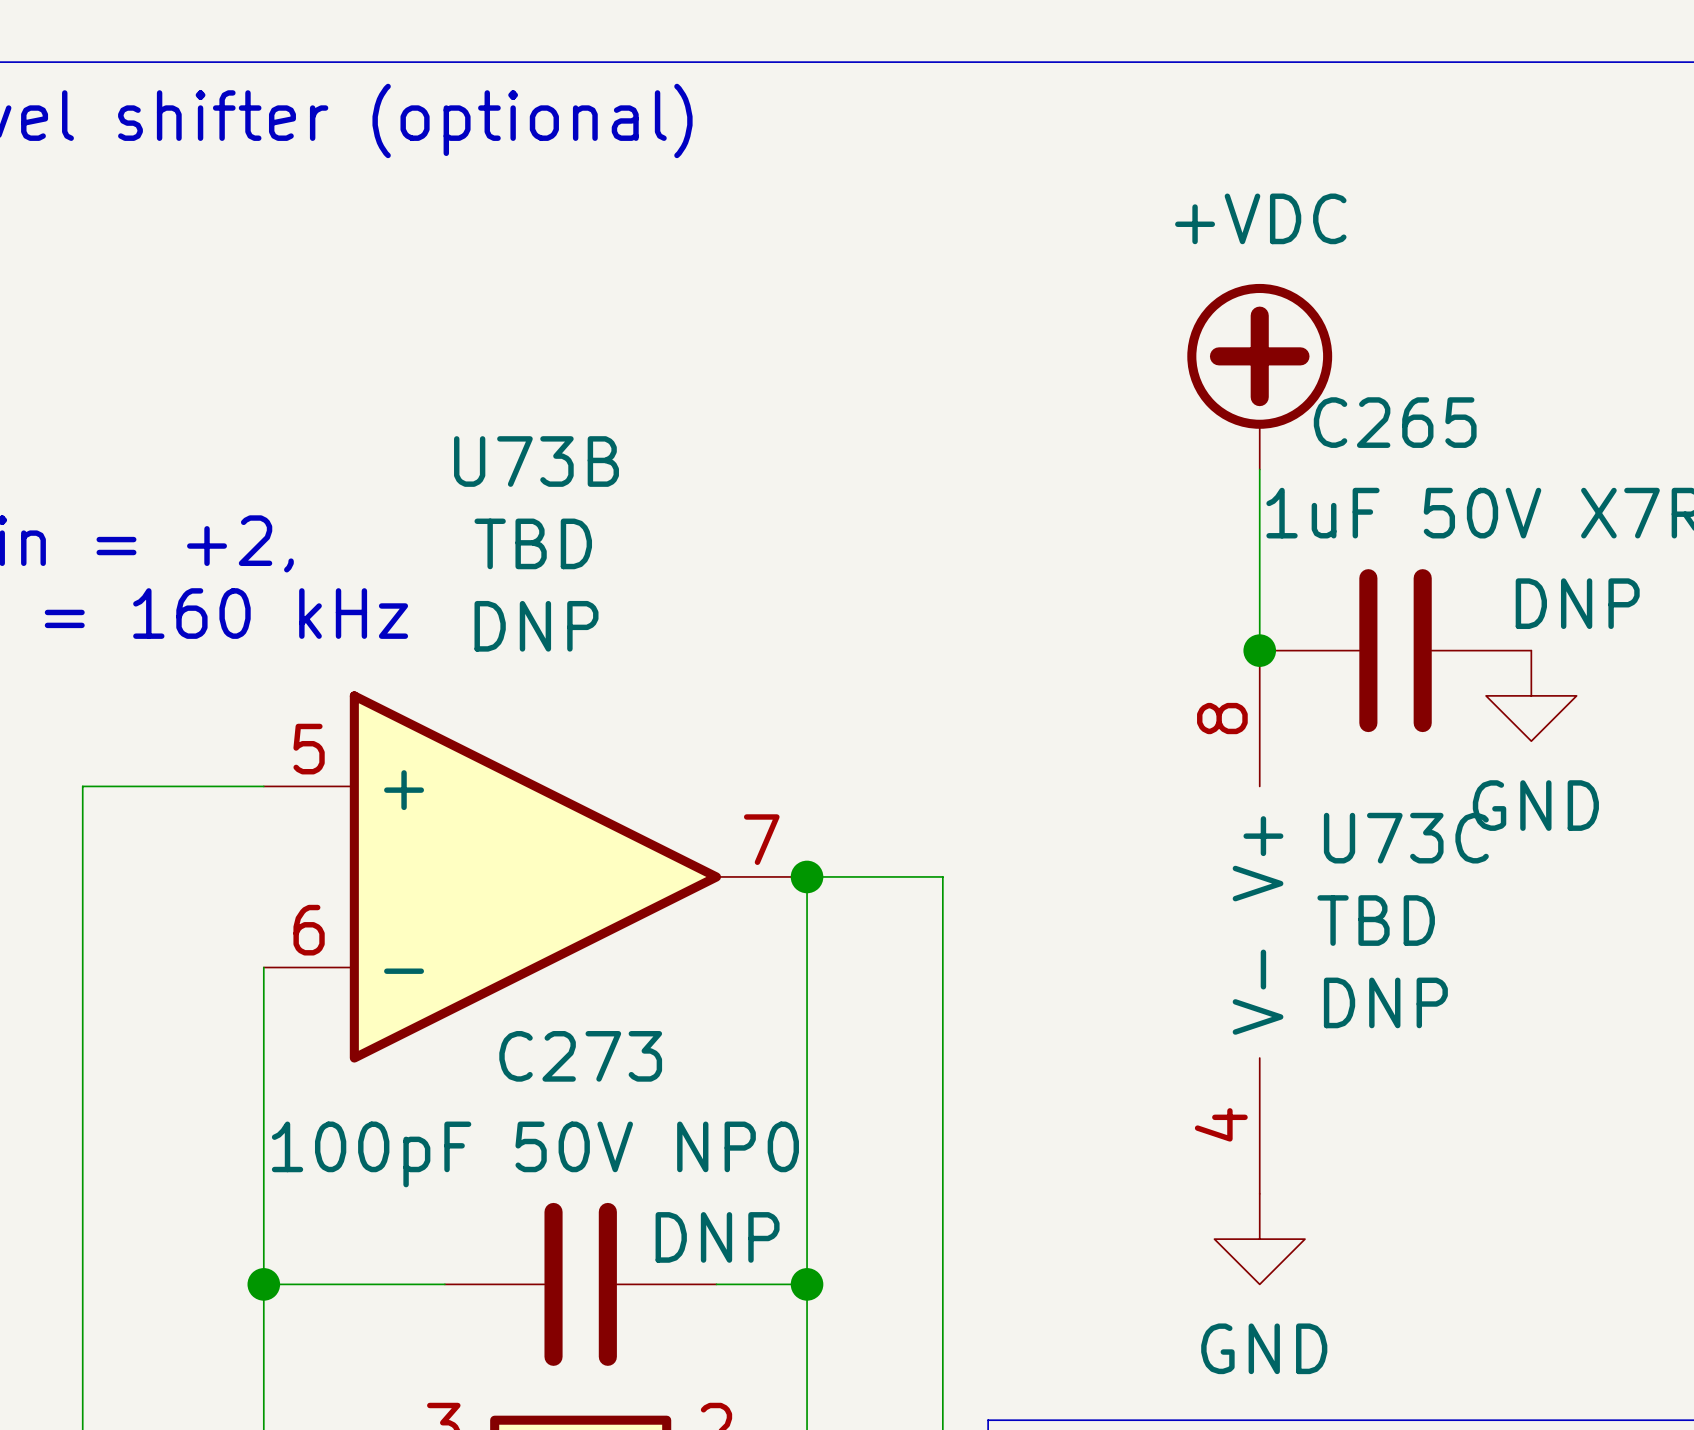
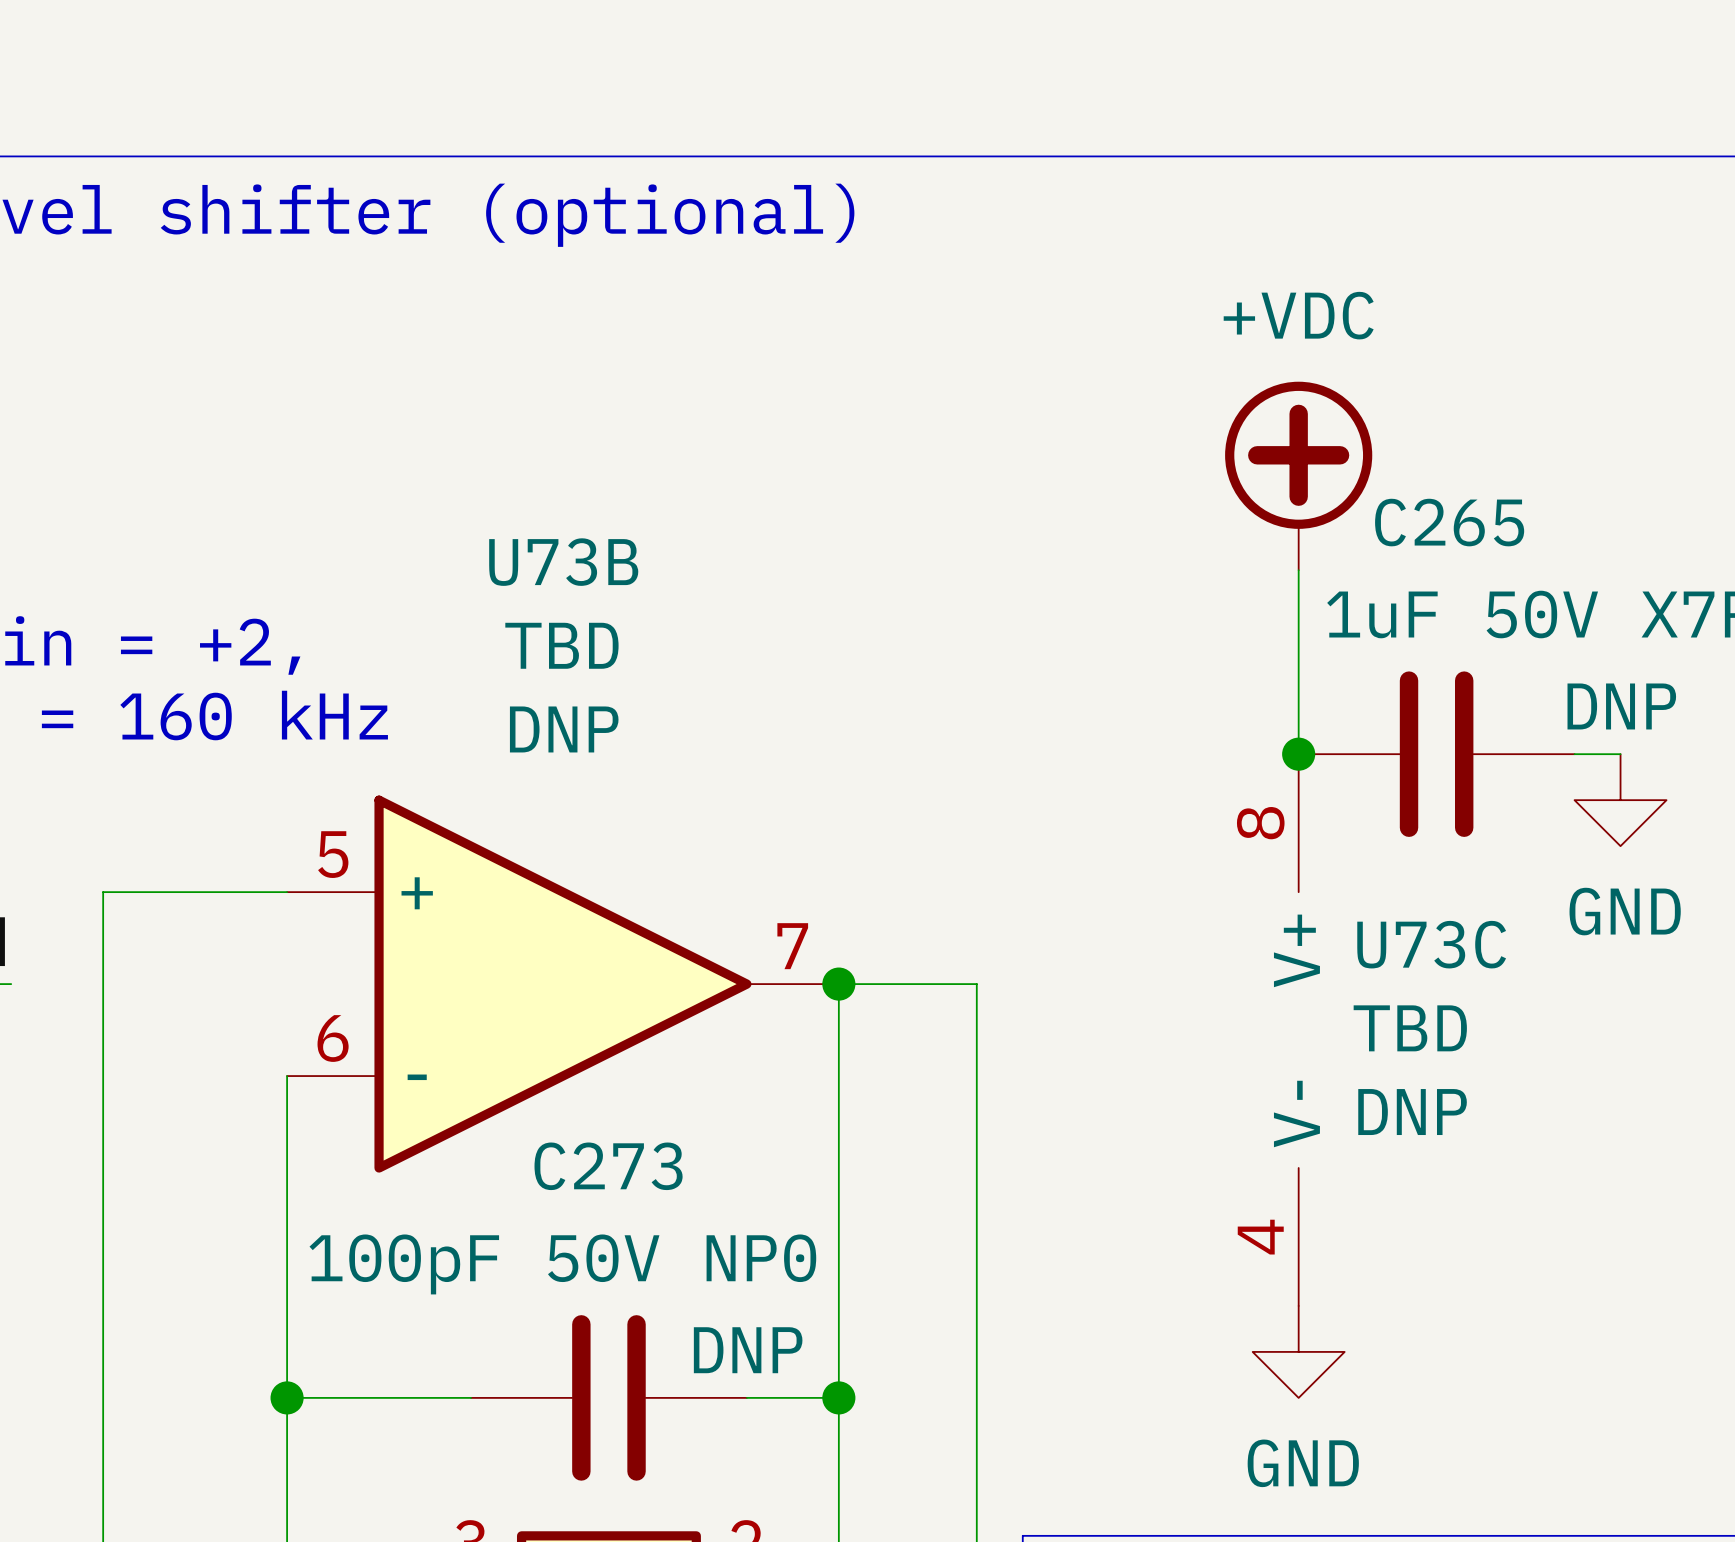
wire: none -> (1574, 754) (1620, 754)
power symbol position: GND (1531, 695) -> GND (1620, 800)

